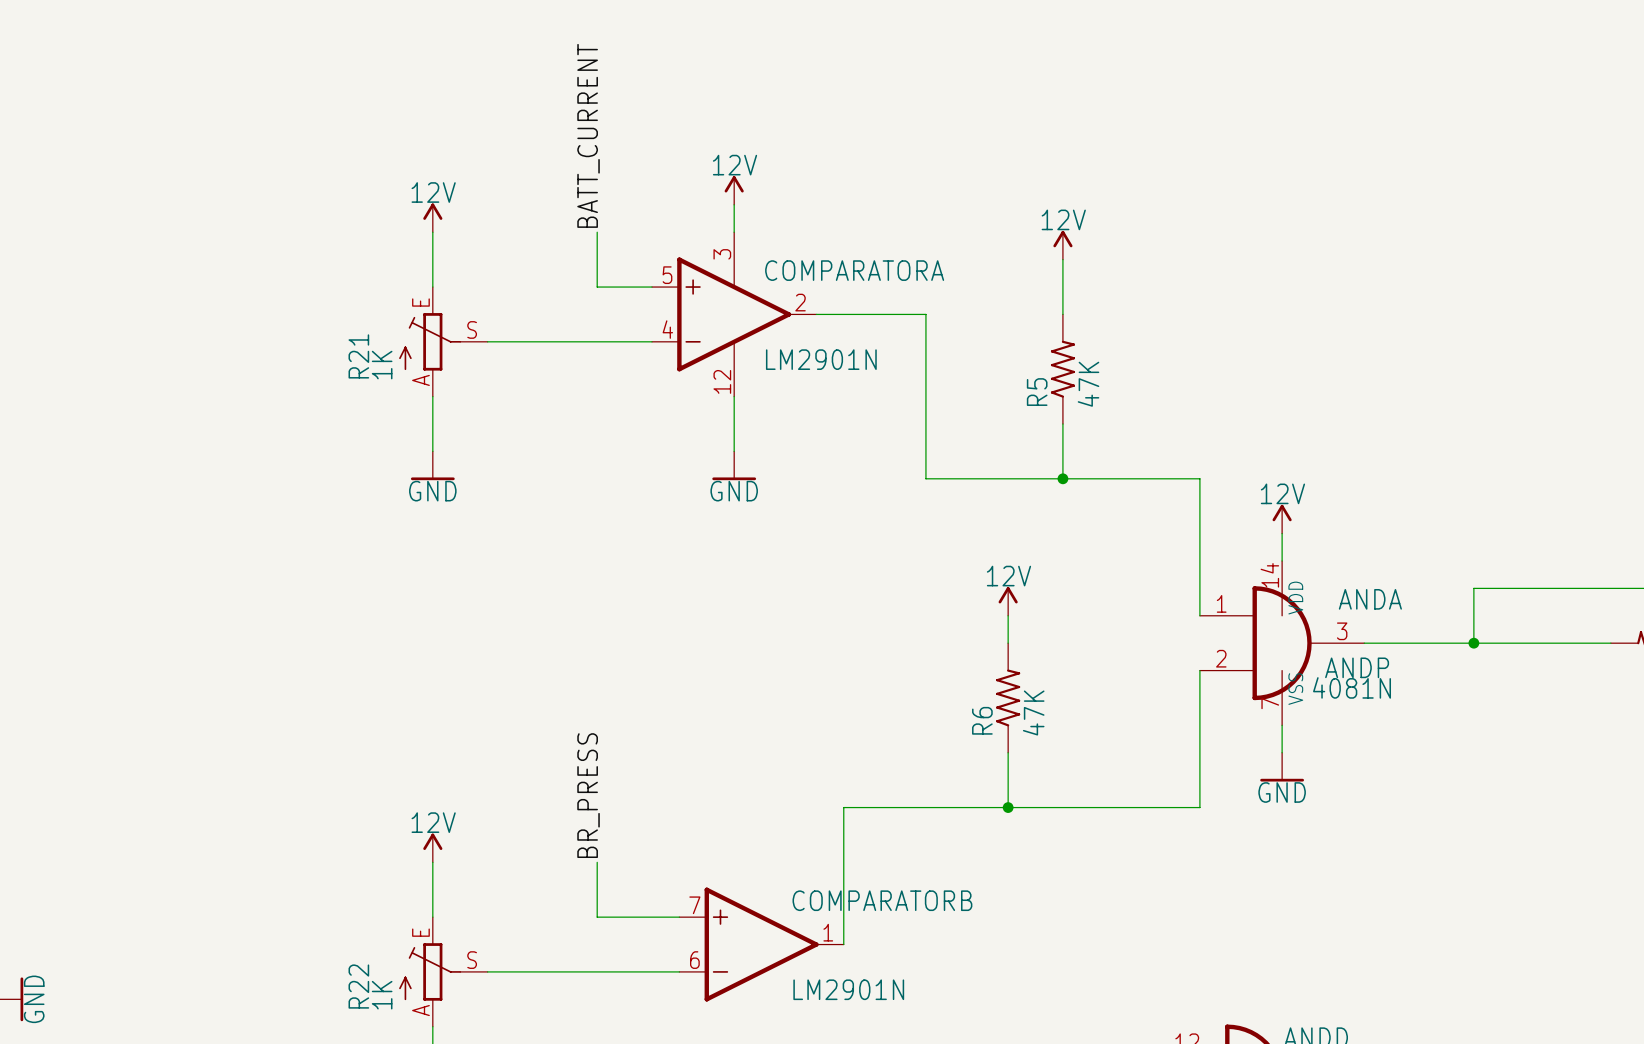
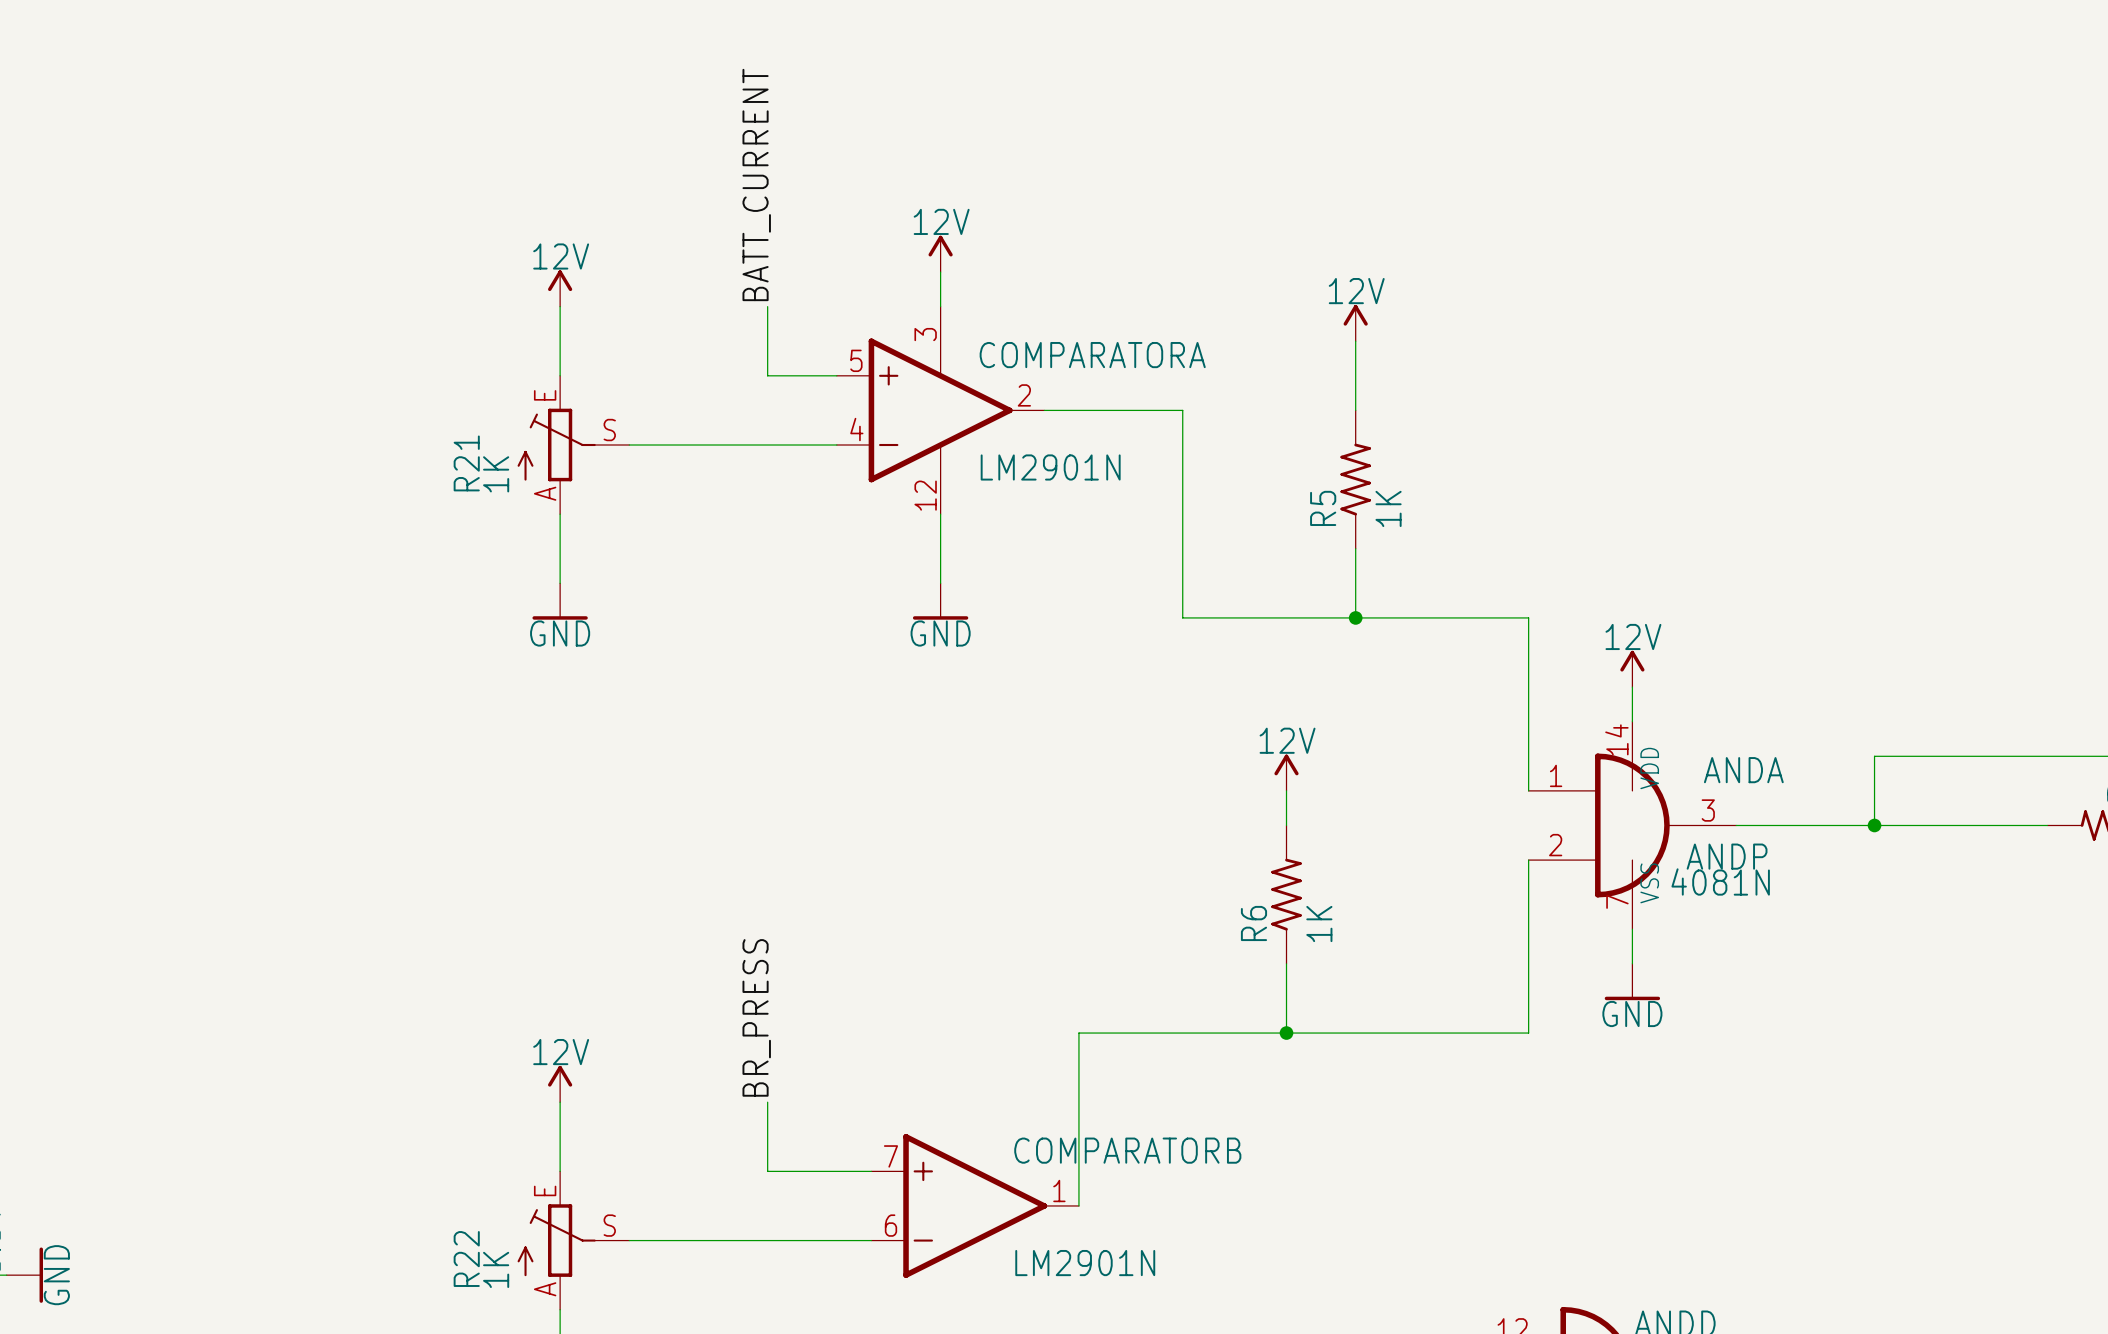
R5 value: 47K (1088, 384) -> 1K (1388, 508)
R6 value: 47K (1033, 712) -> 1K (1319, 924)

